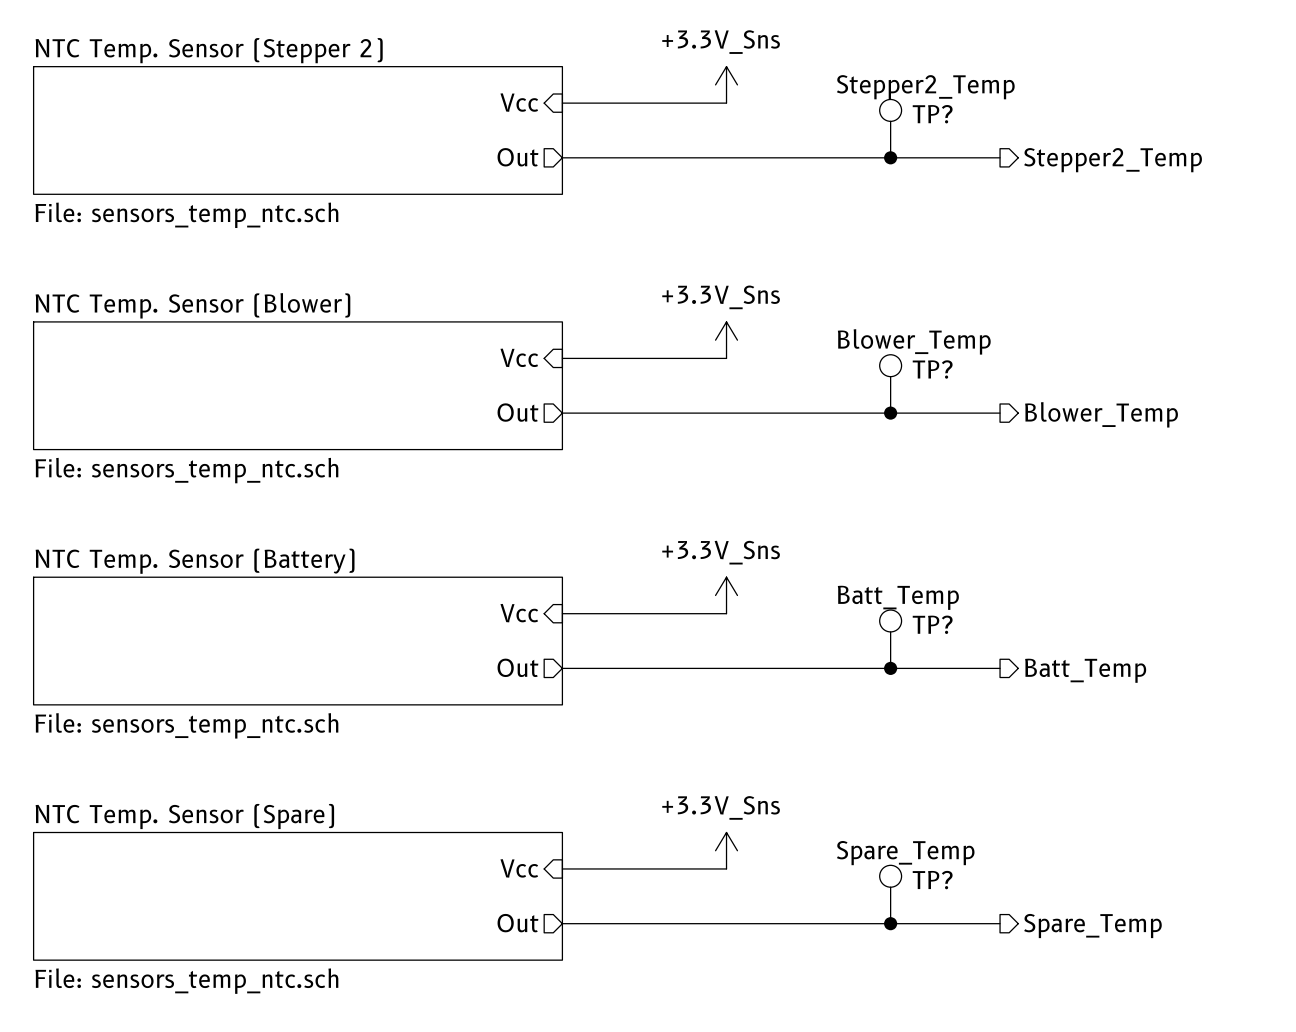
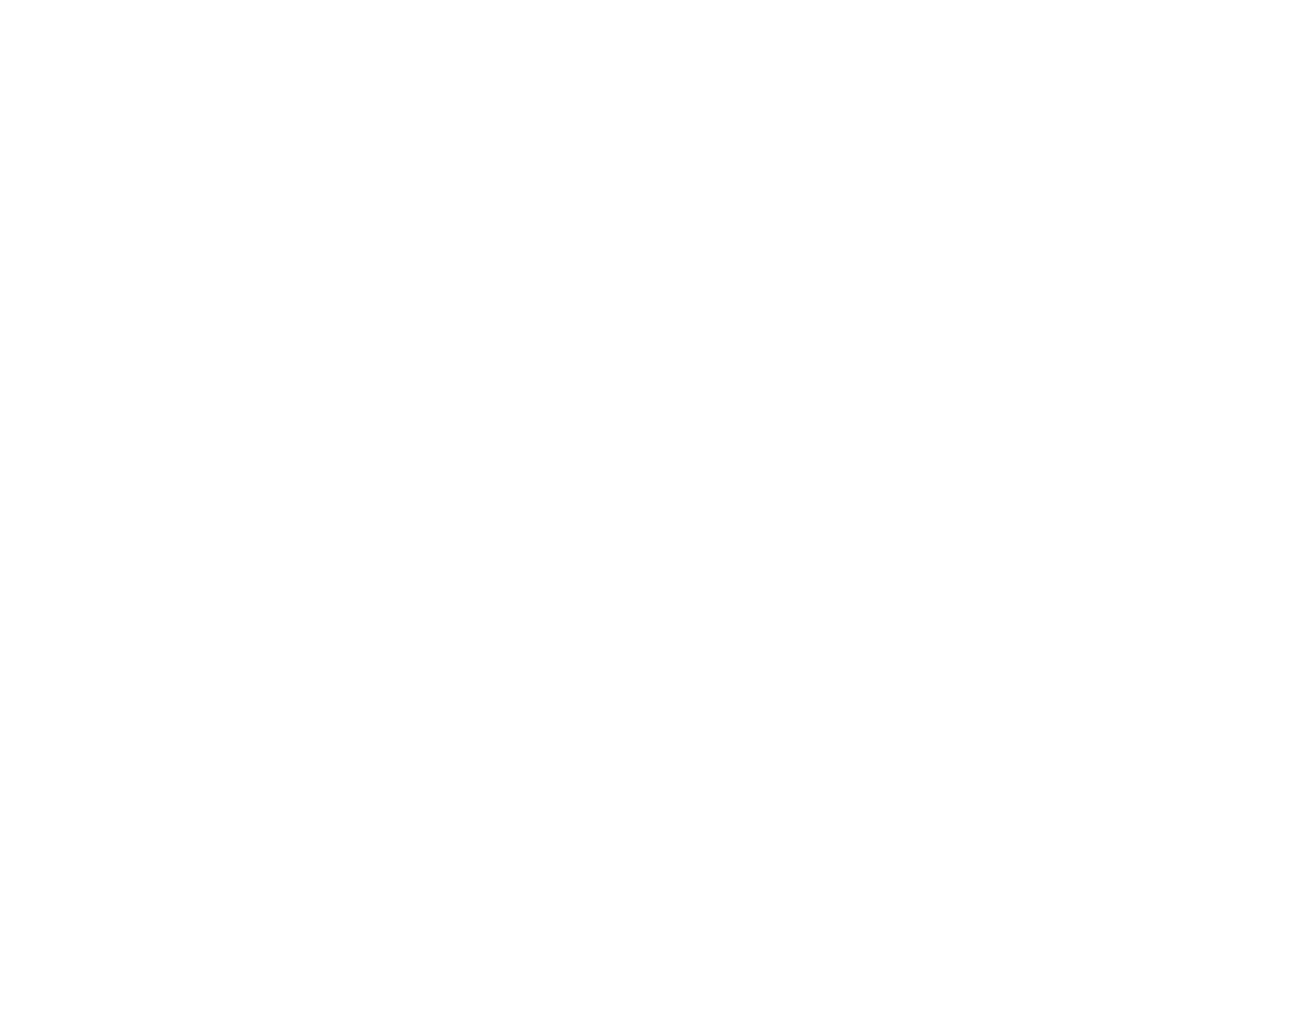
power symbol: +3.3V_Sns (726, 84) -> none
sheet pin: Vcc (519, 102) -> none
wire: (562, 103) (726, 103) -> none
TP?: Stepper2_Temp (890, 128) -> none
sheet NTC Temp. Sensor (Stepper 2): File: sensors_temp_ntc.sch (298, 130) -> none
sheet pin: Out (517, 157) -> none
wire: (562, 157) (1000, 157) -> none
junction: (890, 157) -> none
hierarchical label: Stepper2_Temp (1113, 160) -> none
power symbol: +3.3V_Sns (726, 340) -> none
sheet pin: Vcc (519, 357) -> none
wire: (562, 358) (726, 358) -> none
TP?: Blower_Temp (890, 383) -> none
sheet NTC Temp. Sensor (Blower): File: sensors_temp_ntc.sch (298, 385) -> none
sheet pin: Out (517, 412) -> none
wire: (562, 413) (1000, 413) -> none
junction: (890, 413) -> none
hierarchical label: Blower_Temp (1101, 414) -> none
power symbol: +3.3V_Sns (726, 595) -> none
sheet pin: Vcc (519, 613) -> none
wire: (562, 613) (726, 613) -> none
TP?: Batt_Temp (890, 639) -> none
sheet NTC Temp. Sensor (Battery): File: sensors_temp_ntc.sch (298, 641) -> none
sheet pin: Out (517, 667) -> none
wire: (562, 668) (1000, 668) -> none
junction: (890, 668) -> none
hierarchical label: Batt_Temp (1085, 670) -> none
power symbol: +3.3V_Sns (726, 850) -> none
sheet pin: Vcc (519, 868) -> none
wire: (562, 868) (726, 868) -> none
TP?: Spare_Temp (890, 894) -> none
sheet NTC Temp. Sensor (Spare): File: sensors_temp_ntc.sch (298, 896) -> none
sheet pin: Out (517, 923) -> none
wire: (562, 923) (1000, 923) -> none
junction: (890, 923) -> none
hierarchical label: Spare_Temp (1092, 926) -> none

